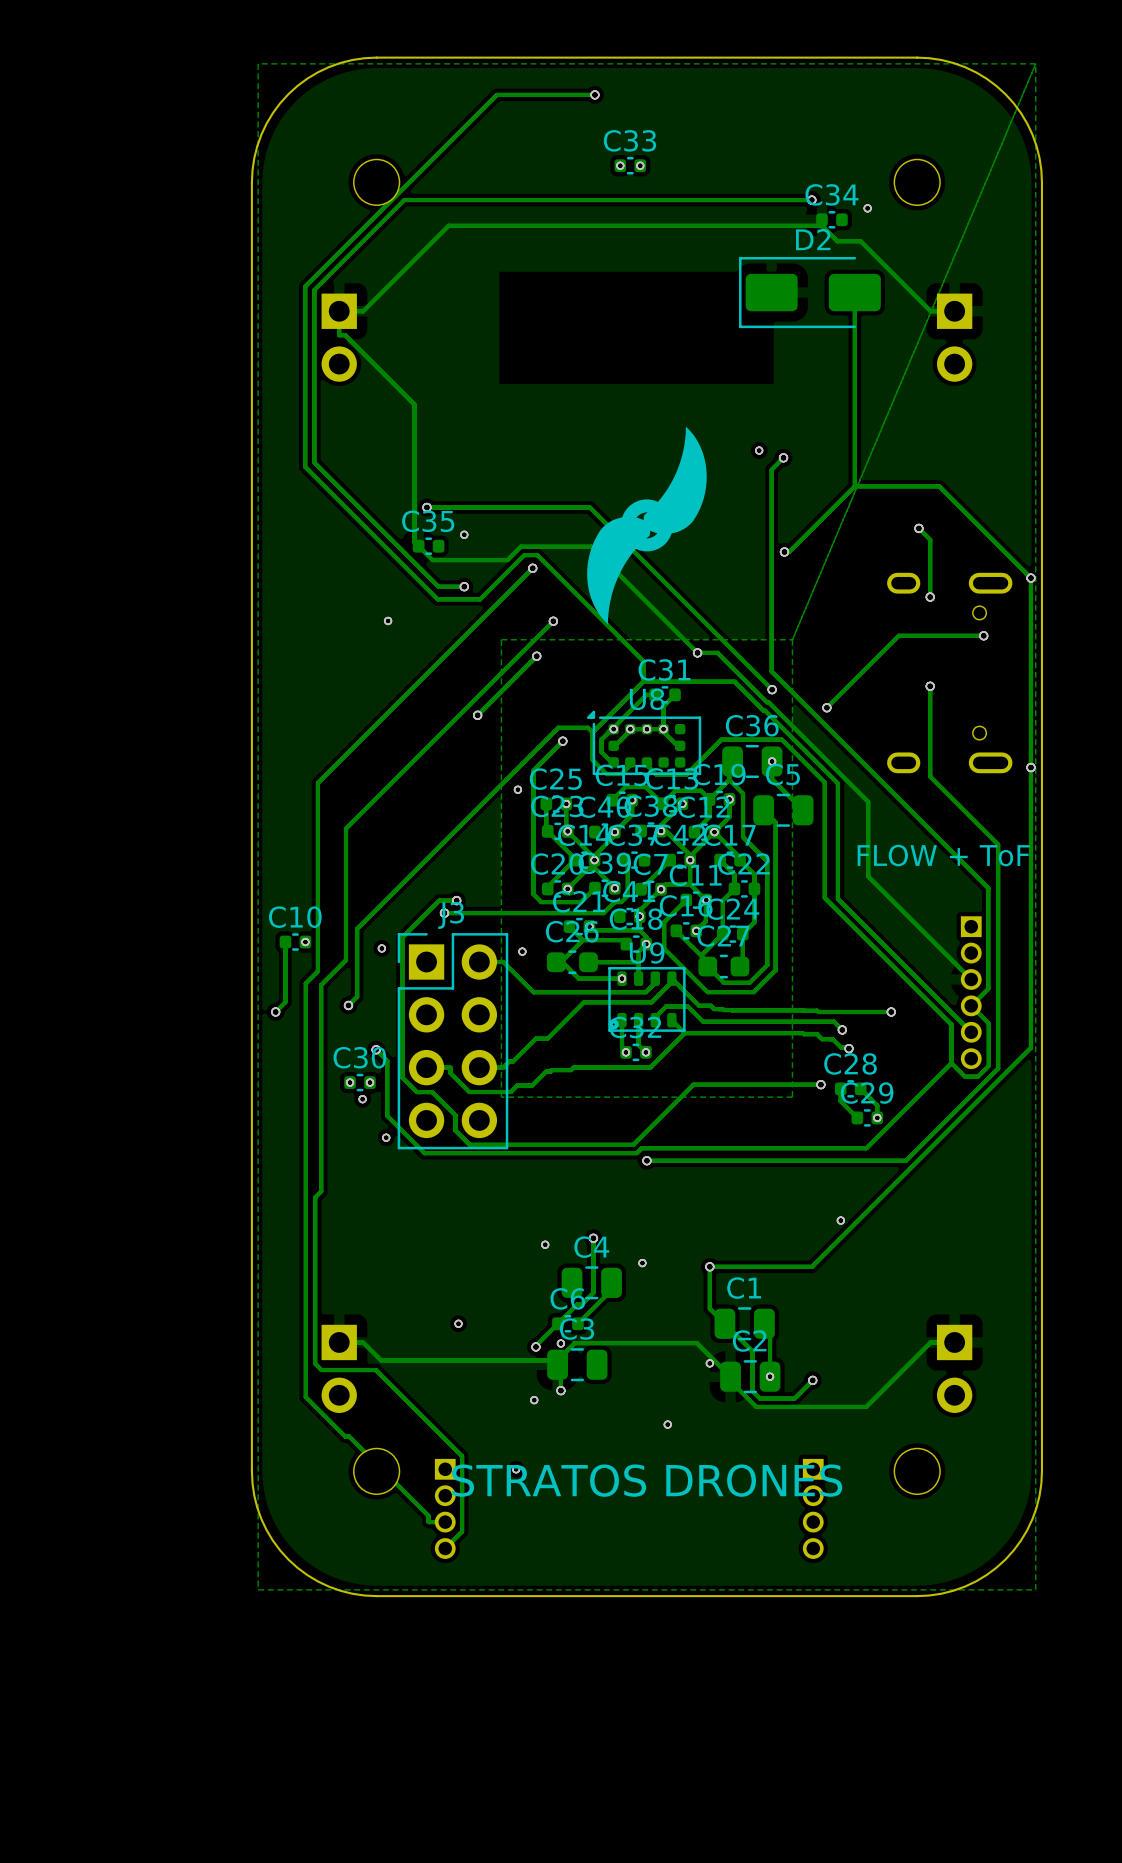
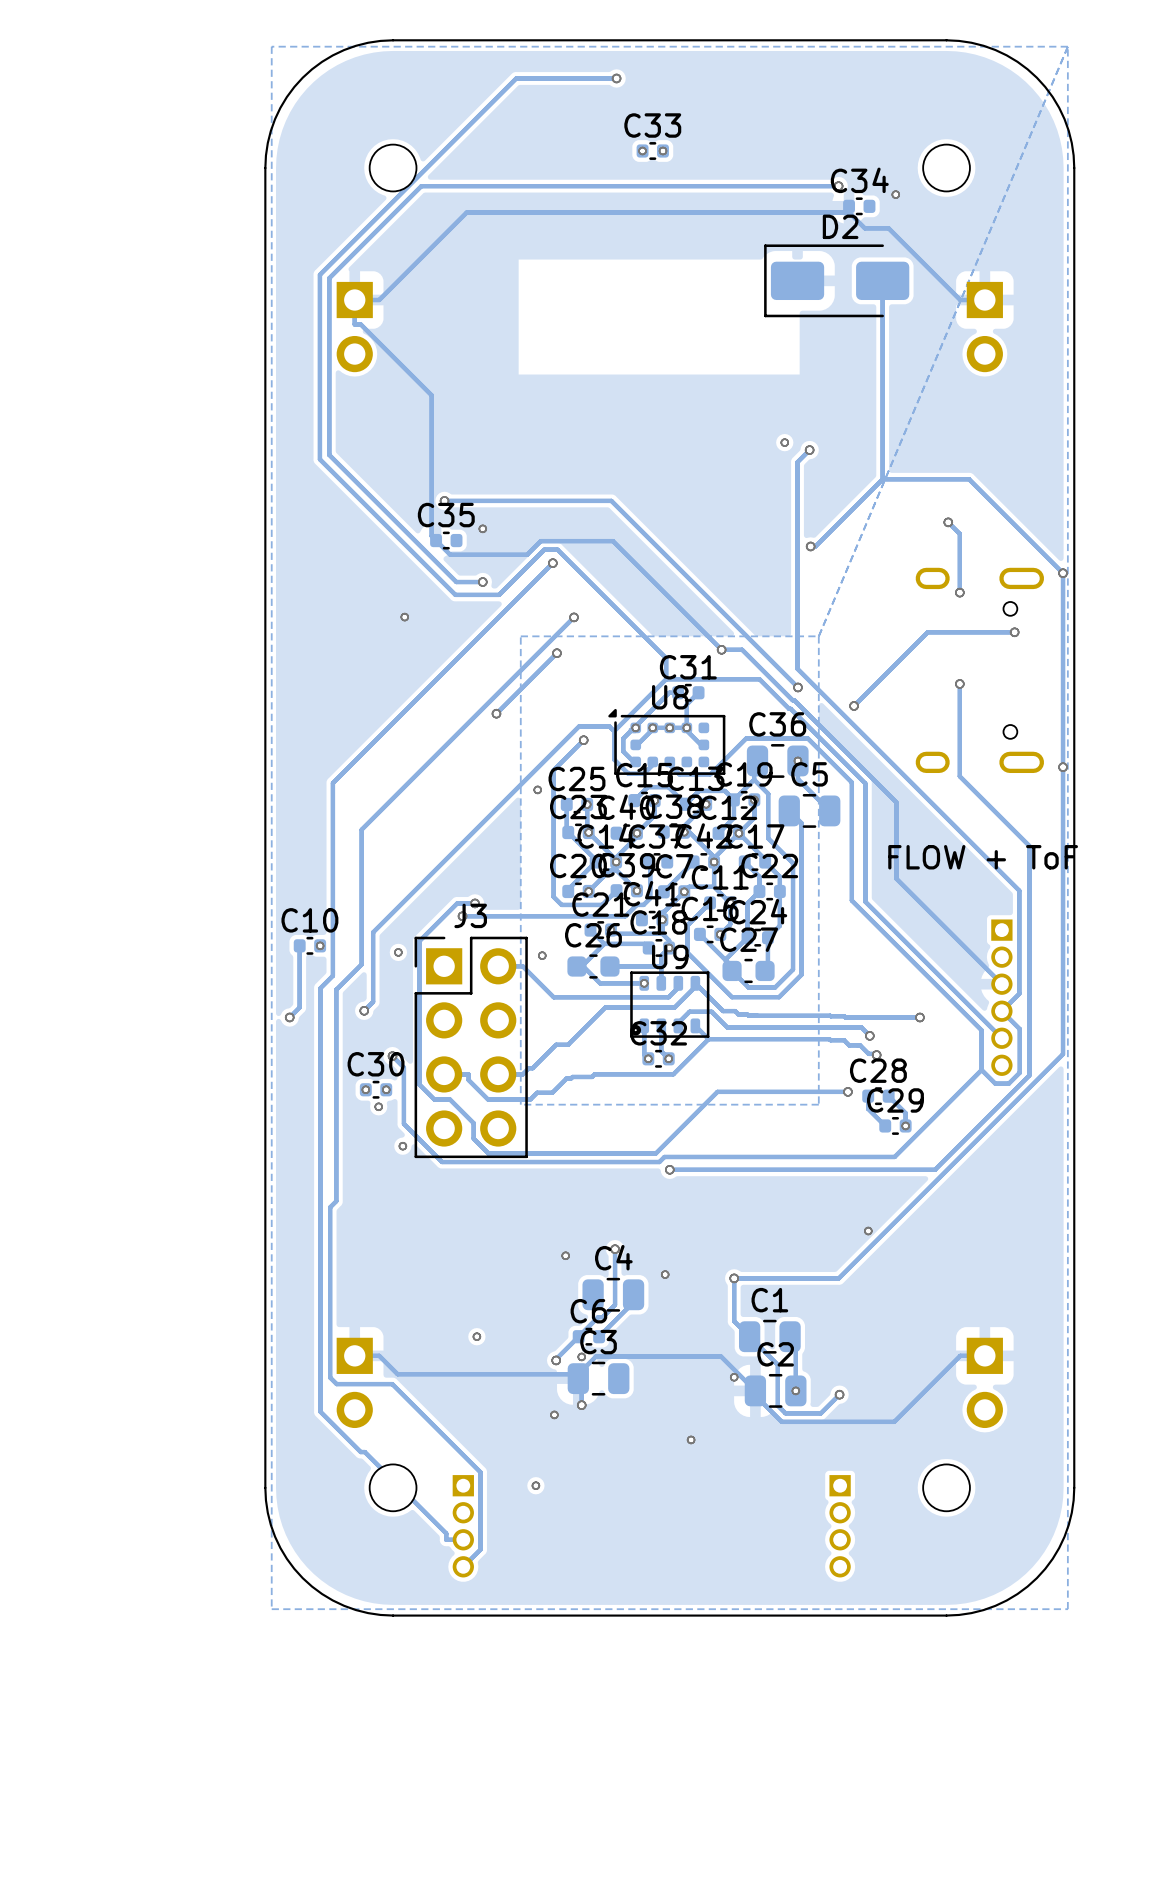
drawing: [587, 426, 707, 625] -> none
text: STRATOS DRONES (647, 1480) -> none

